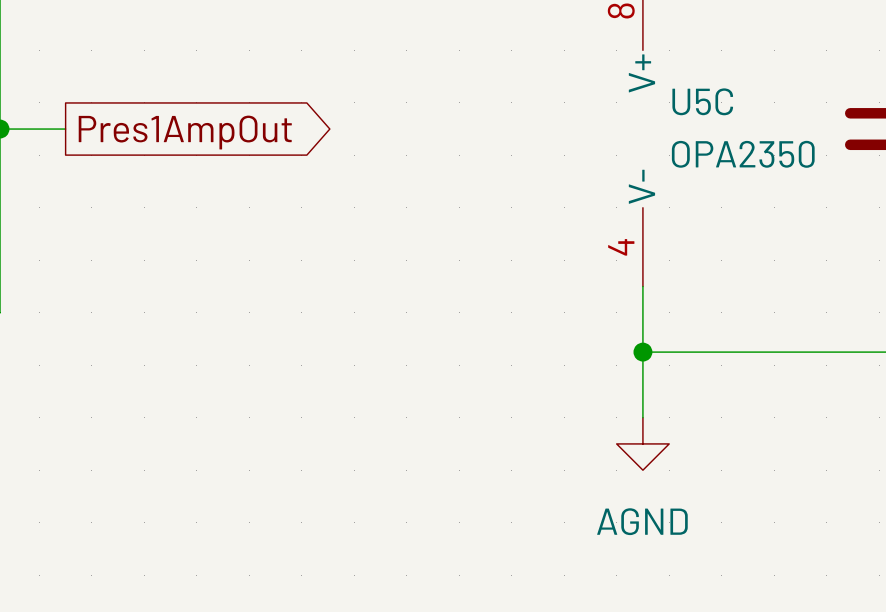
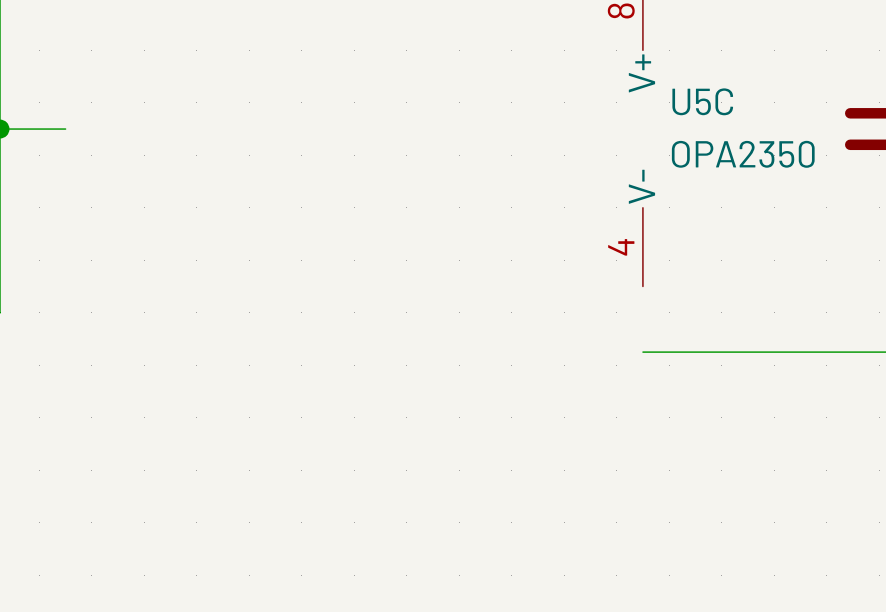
global label: Pres1AmpOut (185, 132) -> none
wire: (642, 286) (642, 417) -> none
junction: (642, 352) -> none
power symbol: AGND (642, 443) -> none

